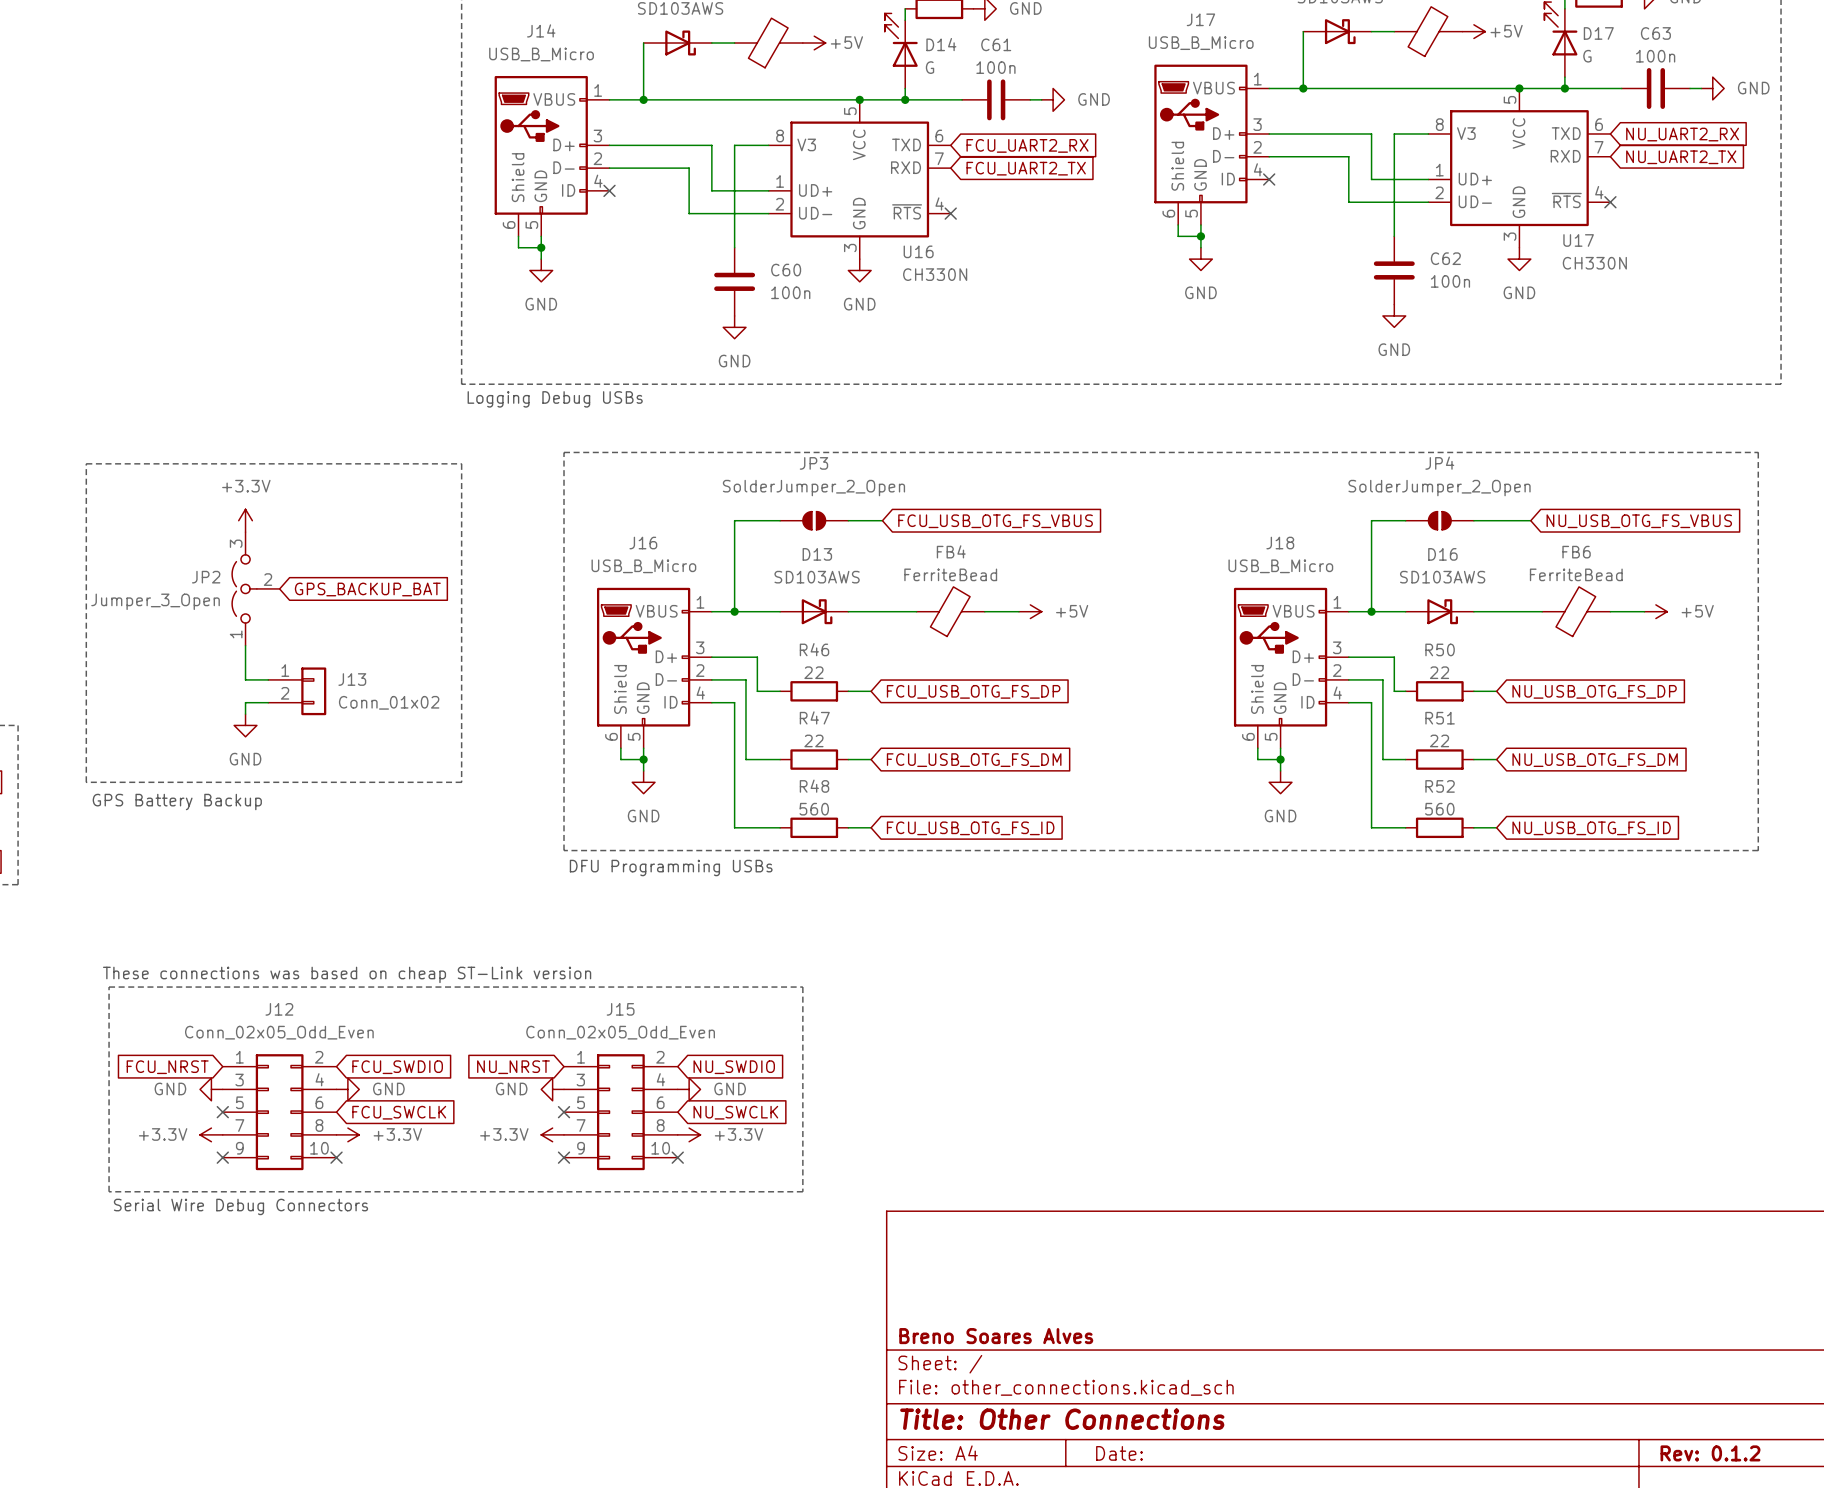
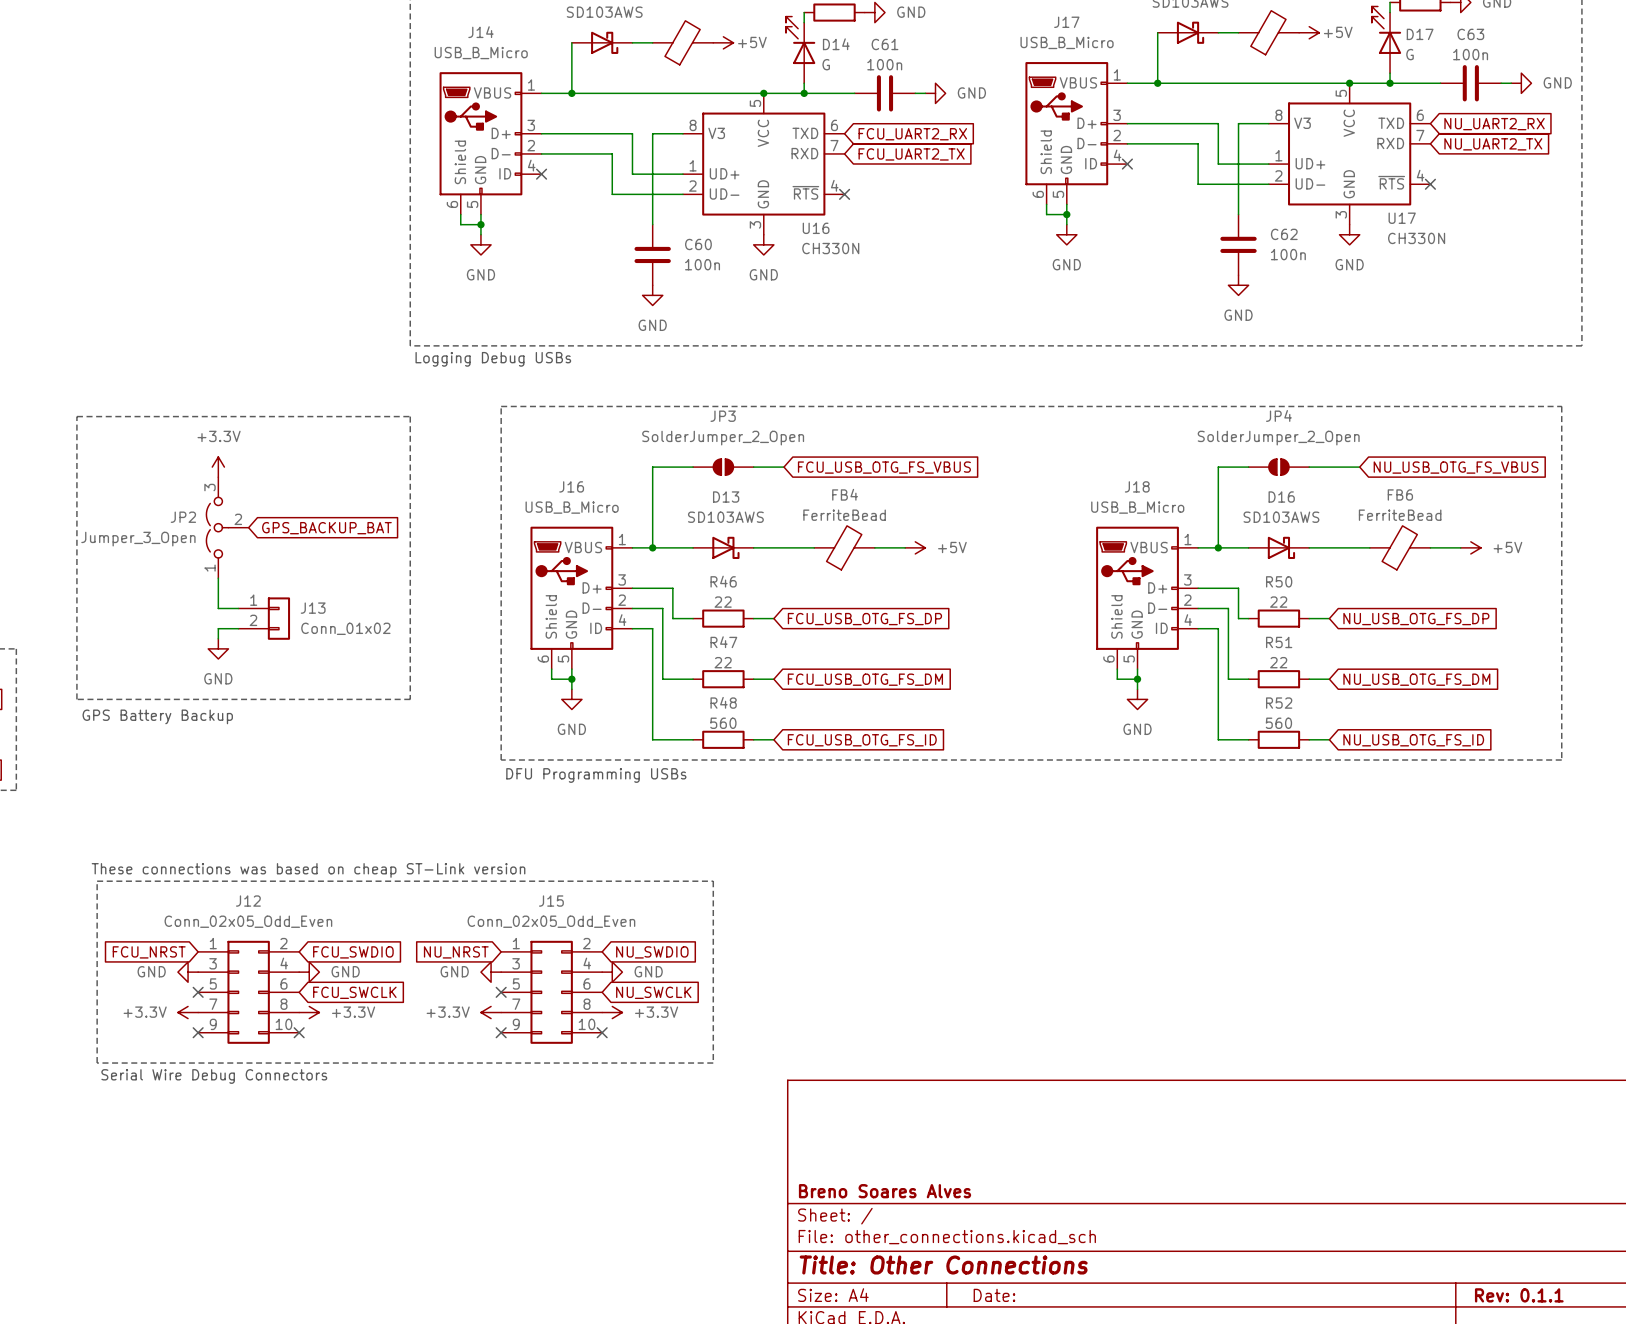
title block: Rev: 0.1.2 (1710, 1453) -> Rev: 0.1.1 (1519, 1295)

